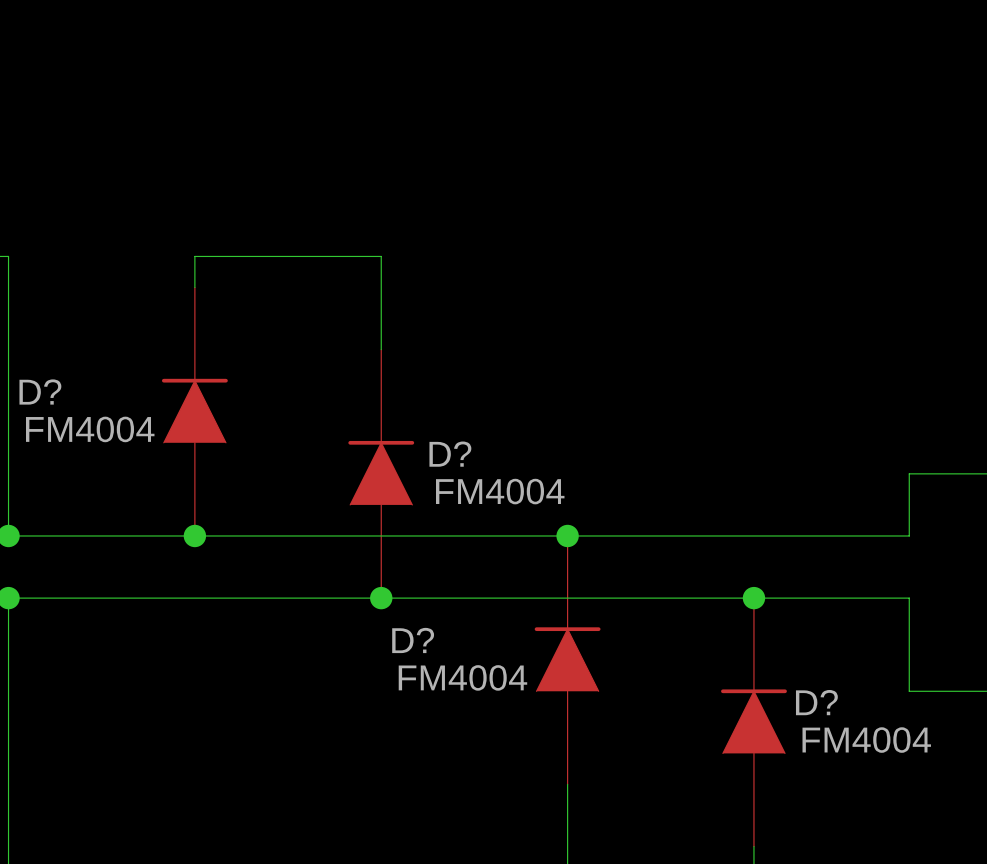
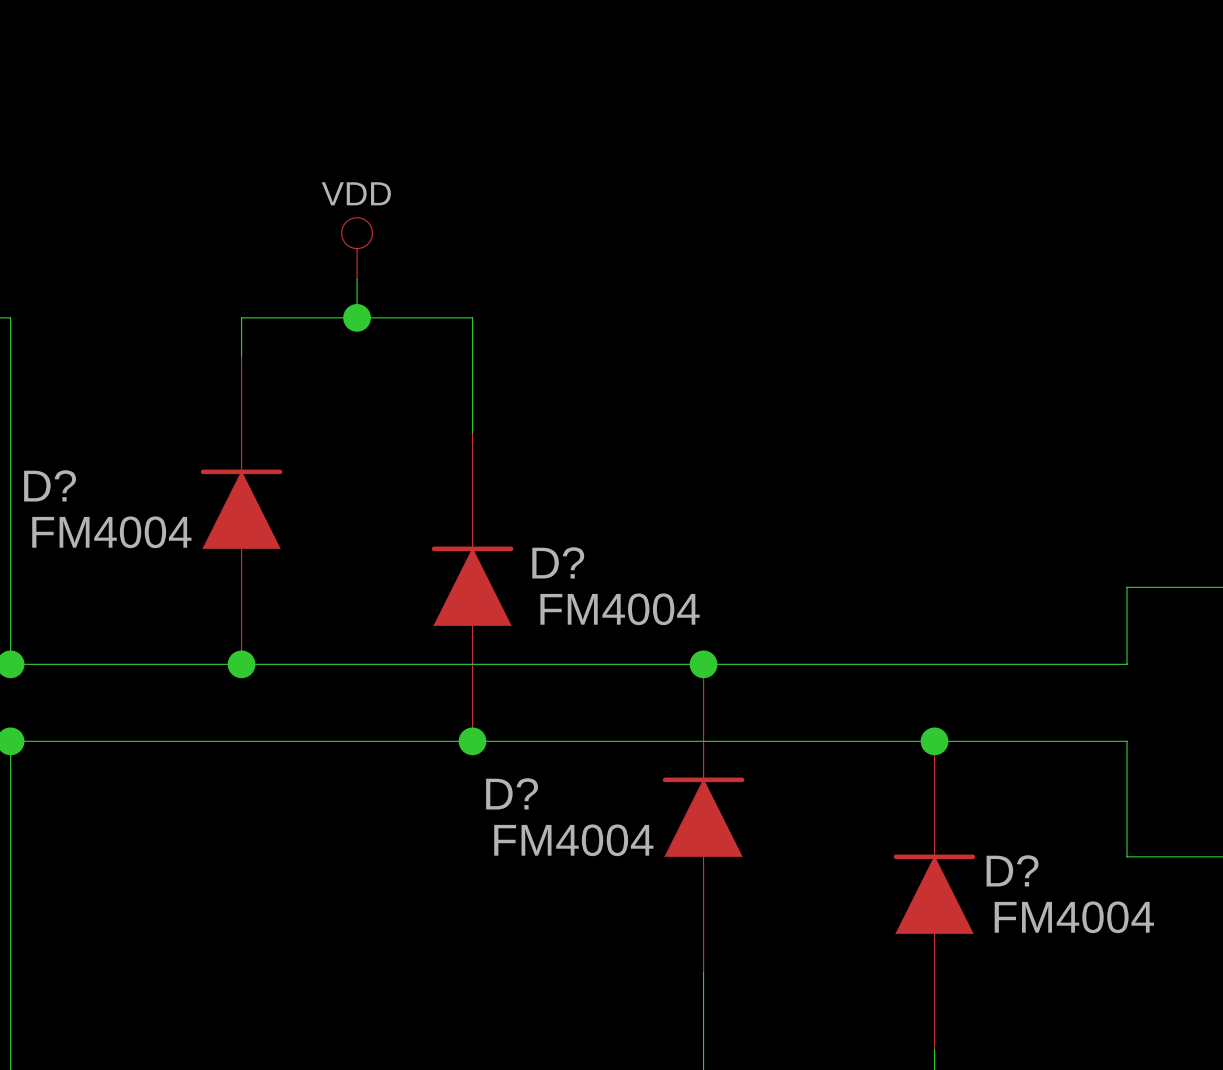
power symbol: none -> VDD (357, 248)
wire: none -> (357, 279) (357, 317)
junction: none -> (357, 317)

